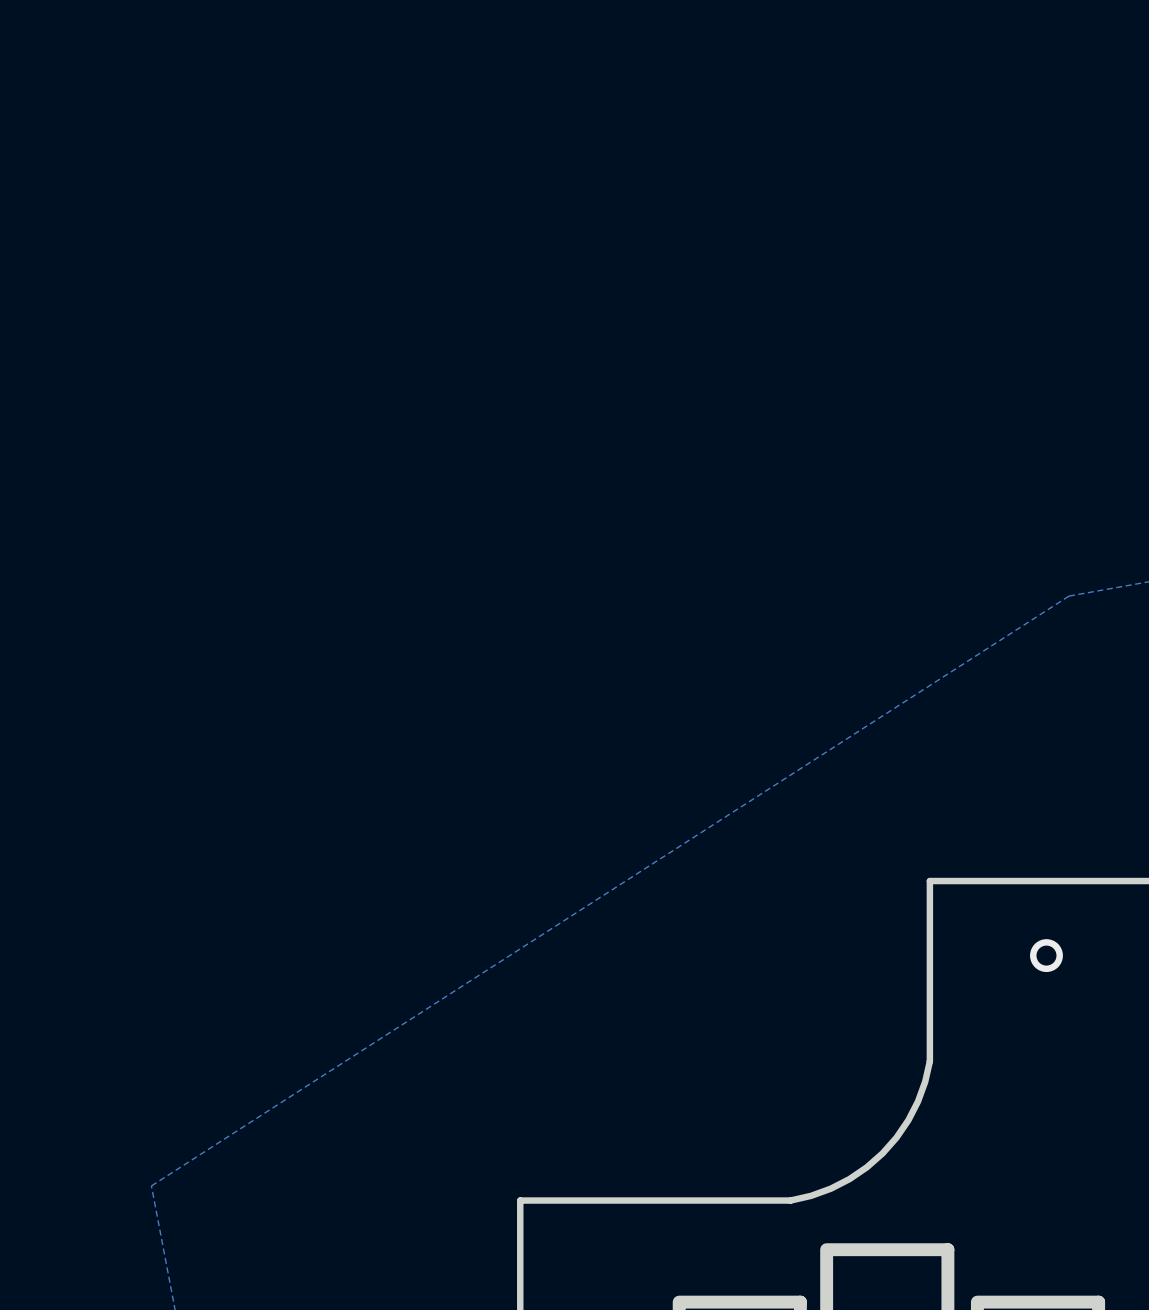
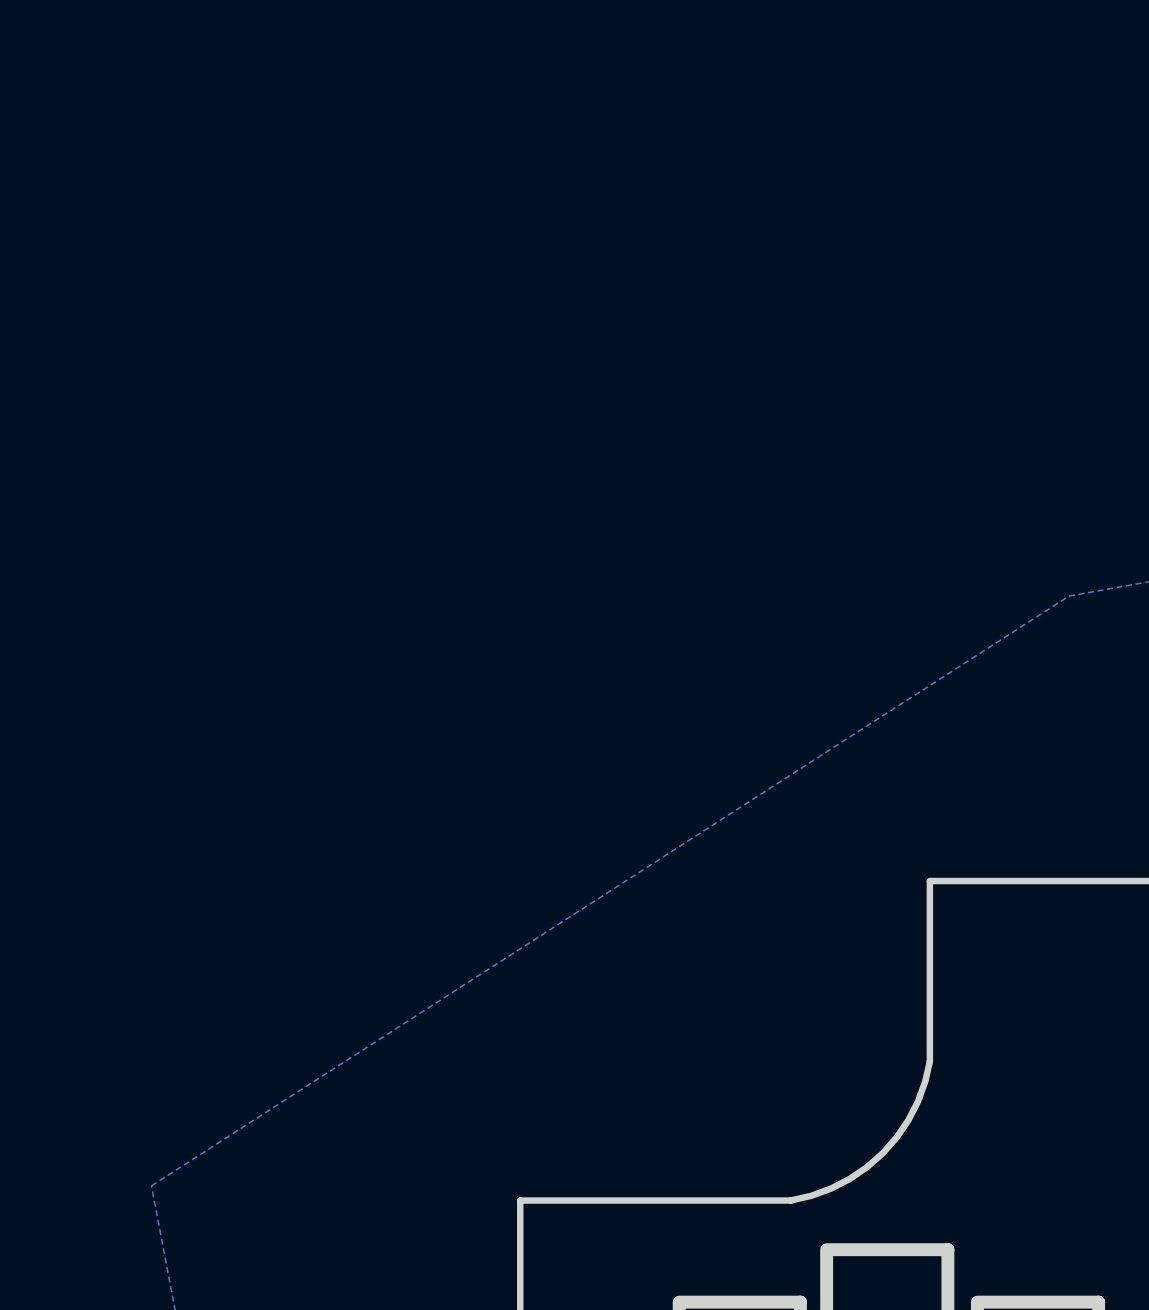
via: (1046, 955) -> none

